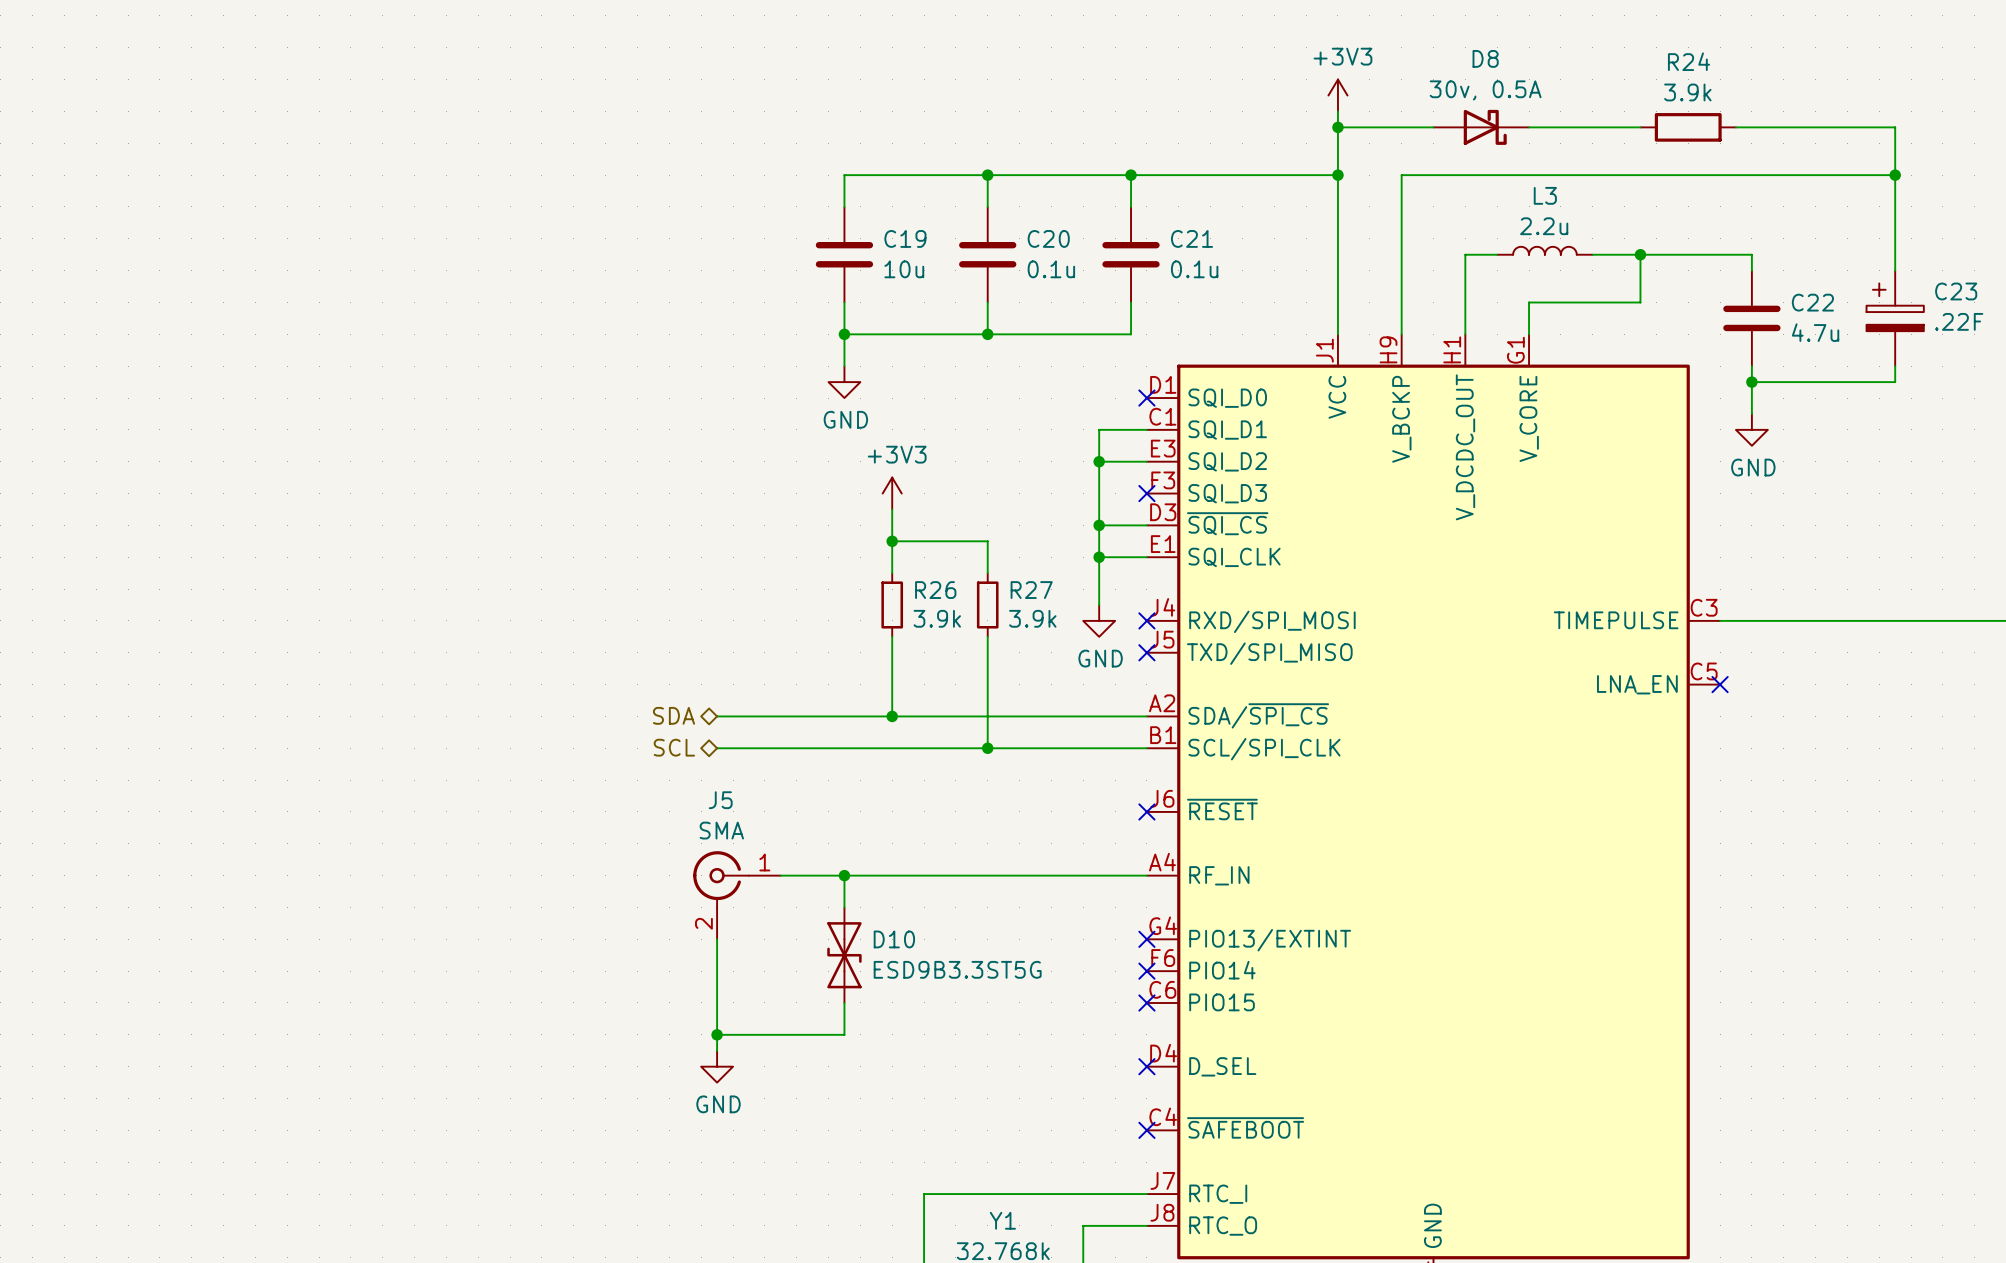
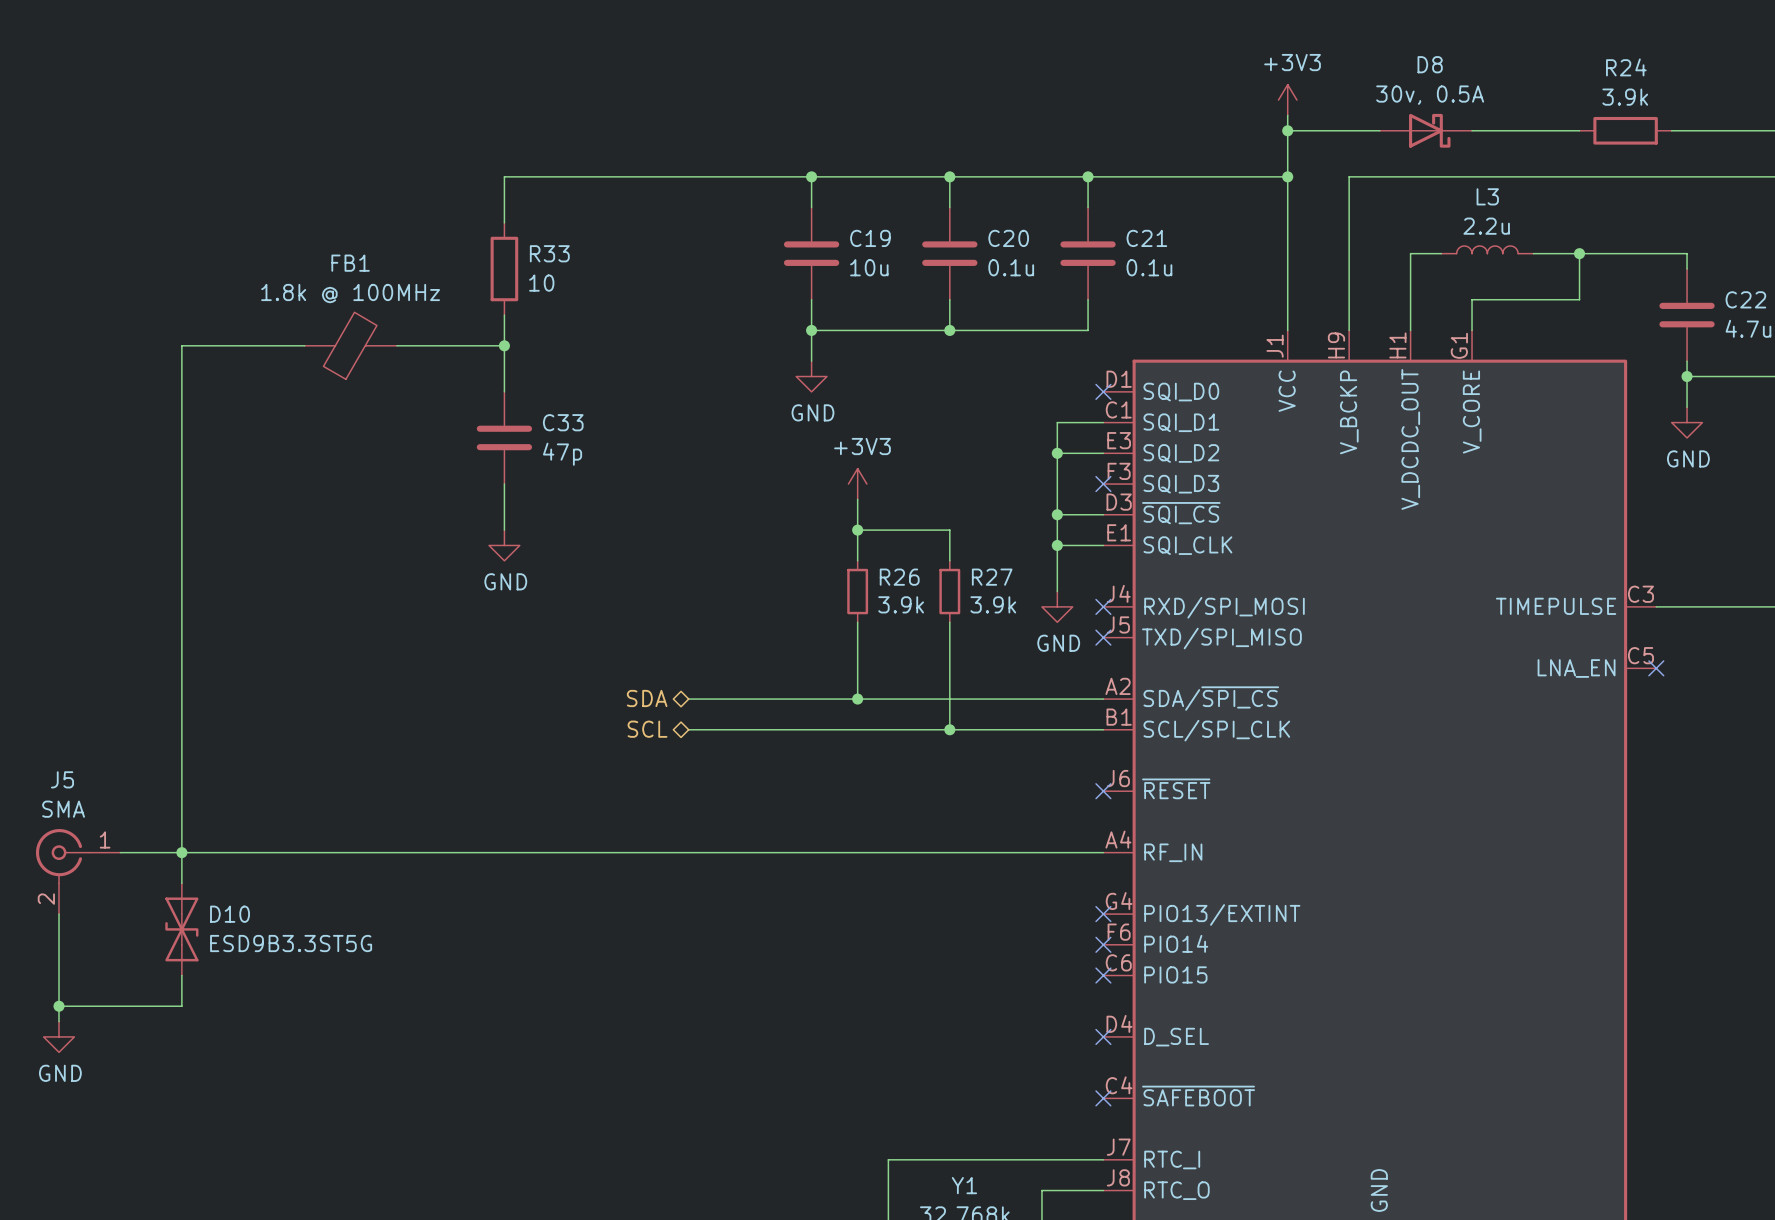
wire: none -> (811, 176) (504, 176) (504, 222)
junction: none -> (811, 176)
R33: none -> 10 (504, 269)
wire: none -> (504, 315) (504, 391)
wire: none -> (304, 345) (181, 345) (181, 883)
FB1: none -> 1.8k @ 100MHz (350, 345)
wire: none -> (396, 345) (504, 345)
junction: none -> (504, 345)
C33: none -> 47p (504, 437)
wire: none -> (504, 484) (504, 530)
power symbol: none -> GND (504, 545)
wire: none -> (120, 852) (750, 852)
junction: none -> (181, 852)
wire: (844, 875) (844, 907) -> none
junction: (844, 875) -> none
J5 position: (736, 895) -> (78, 871)
wire: none -> (59, 914) (59, 1021)
wire: (717, 939) (717, 1050) -> none
D10 position: (844, 955) -> (181, 929)
wire: none -> (181, 975) (181, 1006) (59, 1006)
wire: (844, 1002) (844, 1034) (717, 1034) -> none
junction: none -> (59, 1006)
junction: (717, 1034) -> none
power symbol: none -> GND (59, 1036)
power symbol: GND (717, 1066) -> none

